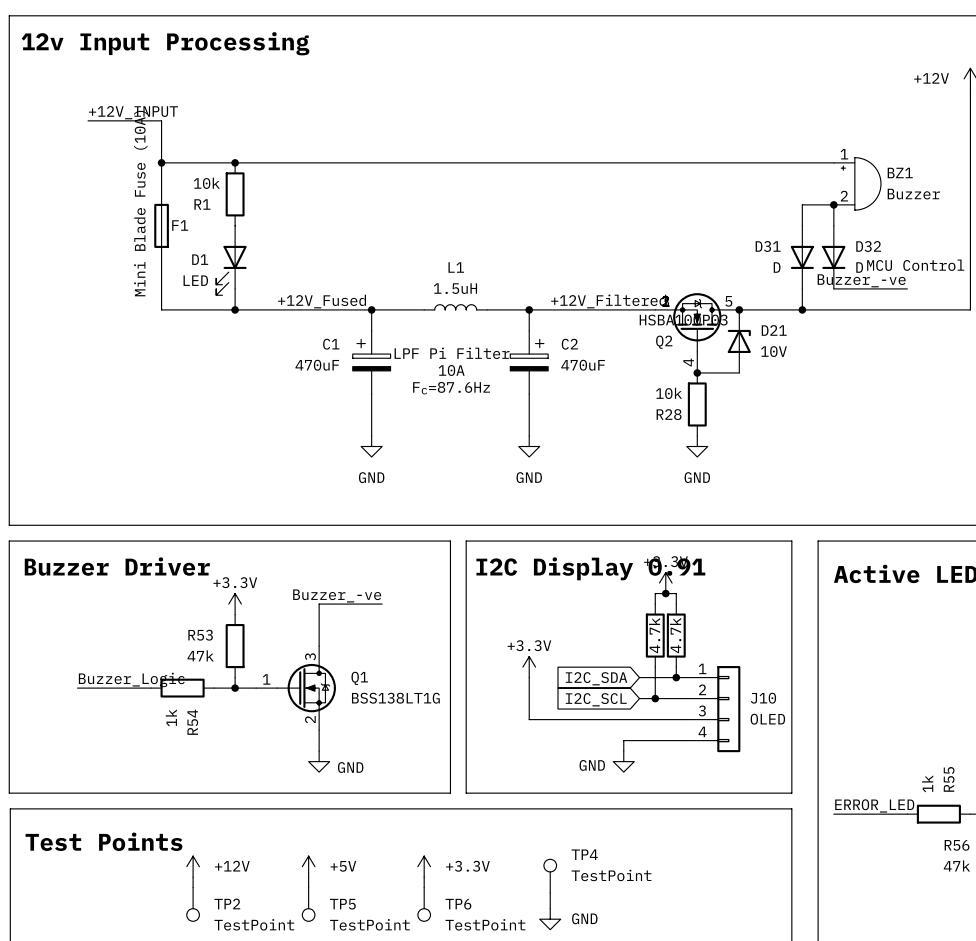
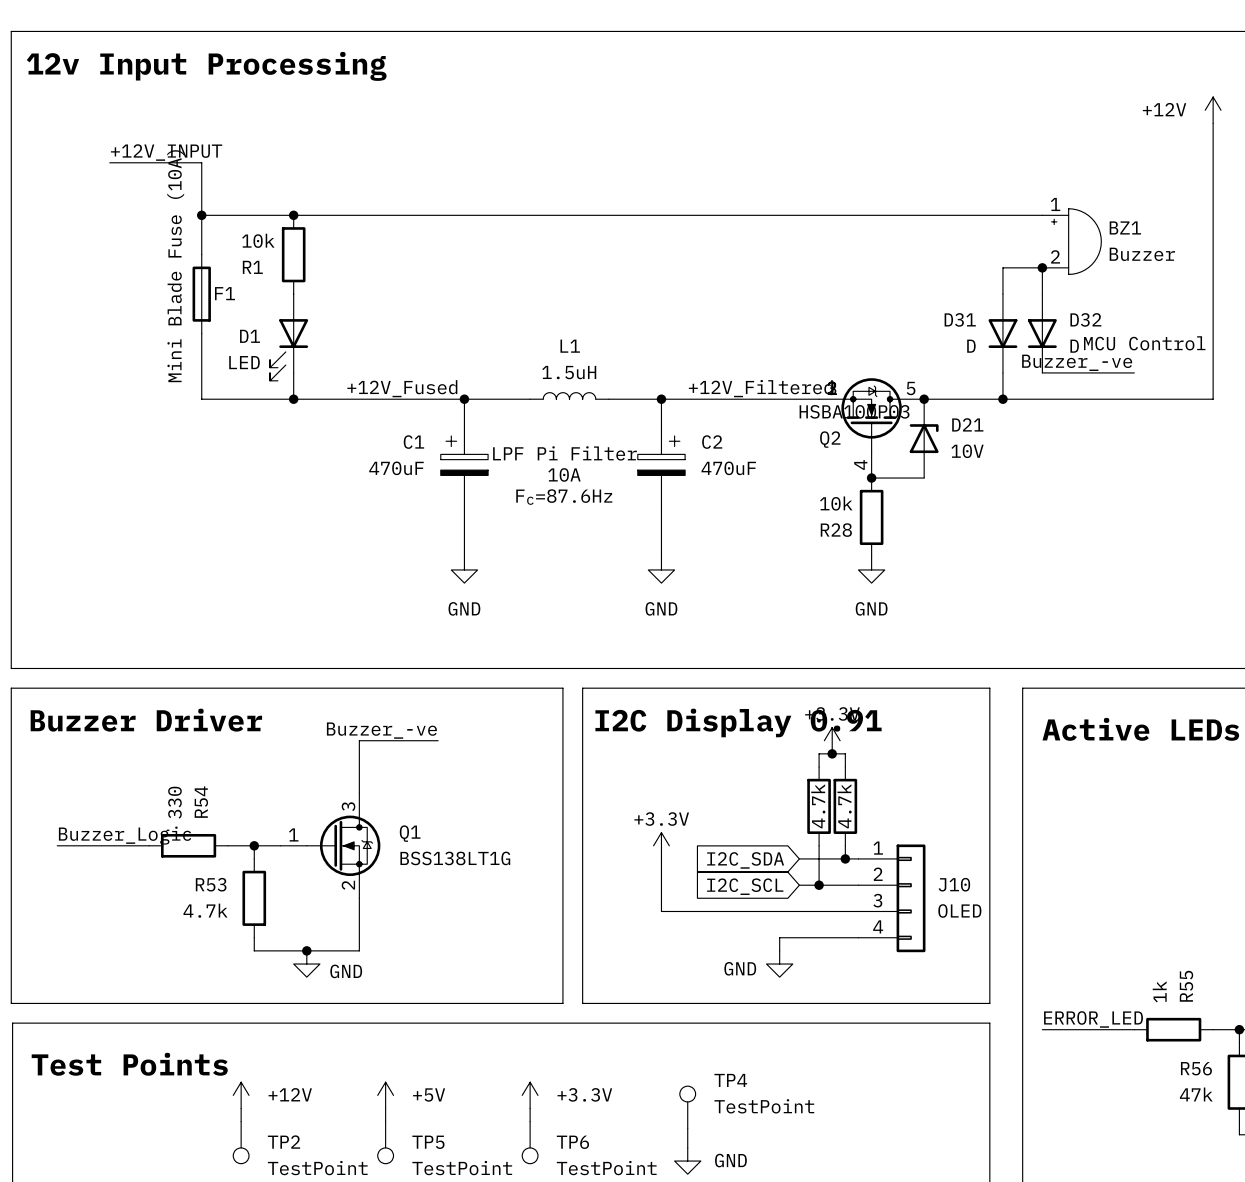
label position: Buzzer_-ve (337, 595) -> Buzzer_-ve (381, 730)
power symbol: +3.3V (235, 604) -> none
wire: (382, 604) (319, 604) (319, 646) -> (438, 740) (359, 740) (359, 793)
R53 position: (235, 646) -> (254, 898)
R53 value: 47k (200, 655) -> 4.7k (205, 910)
junction: none -> (254, 845)
wire: (235, 677) (235, 688) -> (254, 845) (254, 858)
label position: Buzzer_Logic (131, 679) -> Buzzer_Logic (125, 835)
wire: (77, 688) (151, 688) -> (57, 845) (149, 845)
R54 position: (182, 688) -> (188, 845)
wire: (214, 688) (256, 688) -> (228, 845) (280, 845)
junction: (235, 688) -> none
Q1 position: (296, 688) -> (330, 845)
wire: none -> (359, 898) (359, 950) (254, 950) (254, 937)
R54 value: 1k (171, 717) -> 330 (174, 802)
R54 name position: R54 (192, 722) -> R54 (201, 802)
wire: (319, 730) (319, 751) -> none
junction: none -> (306, 950)
power symbol position: GND (319, 761) -> GND (306, 964)

